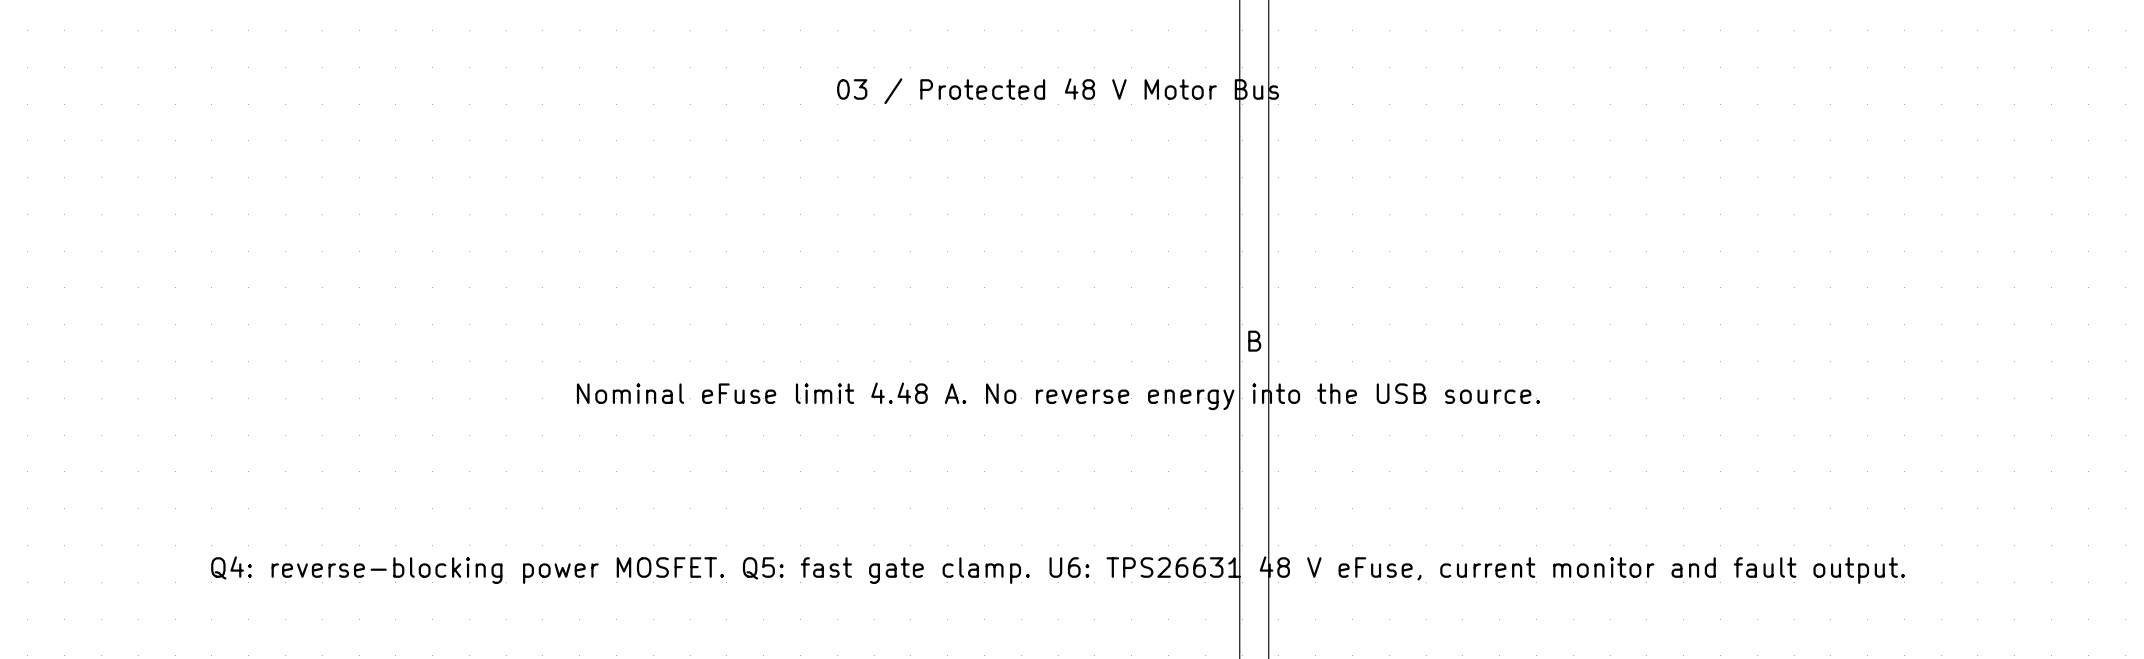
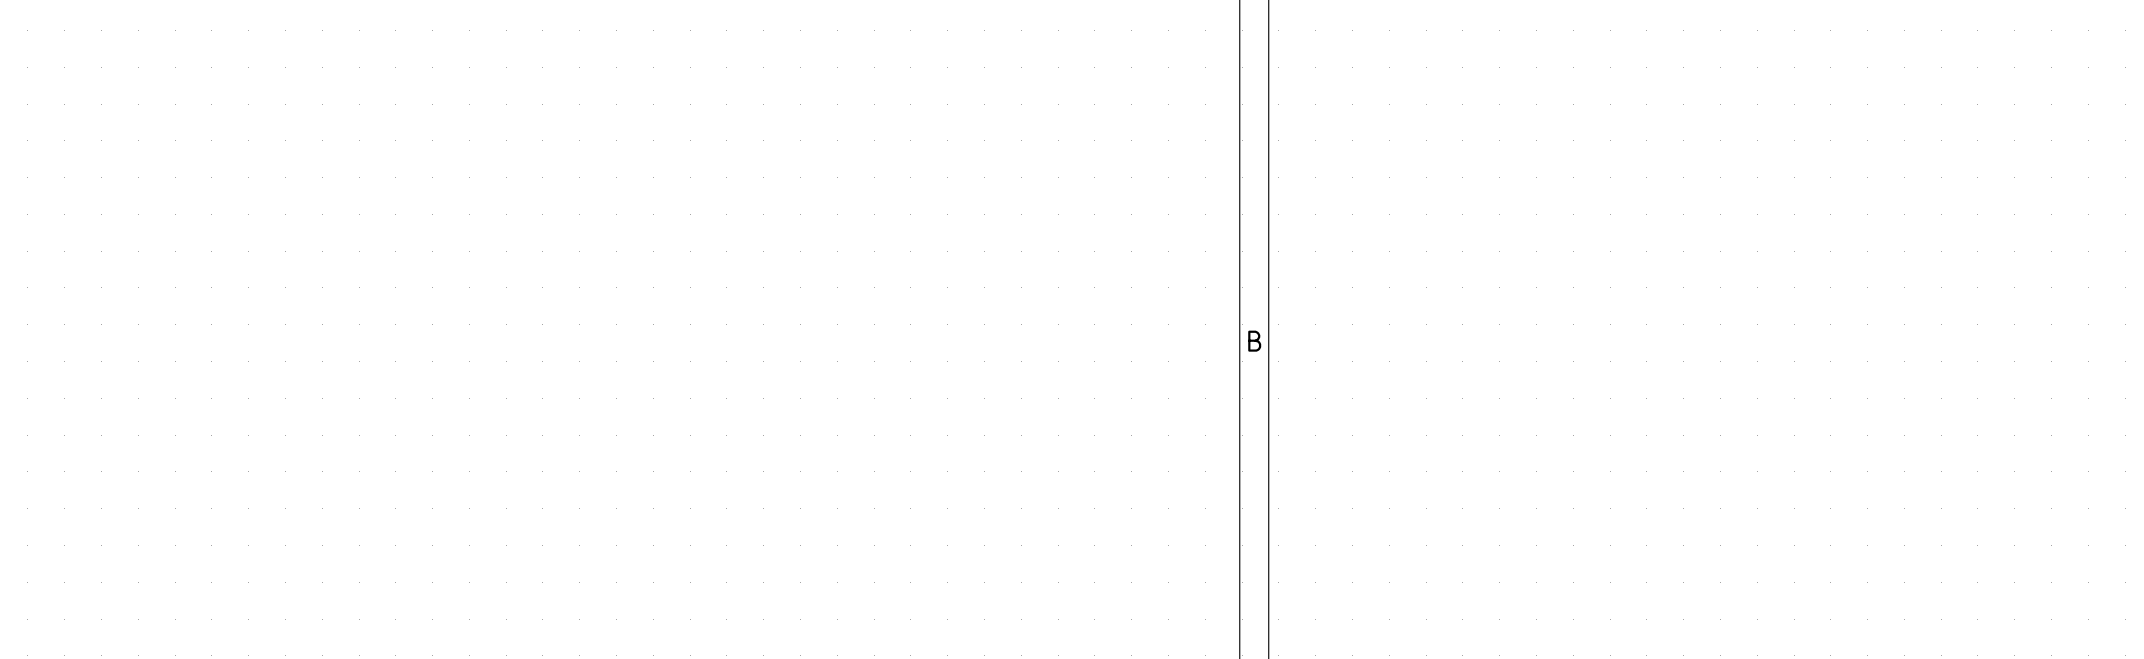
text: 03 / Protected 48 V Motor Bus (1058, 91) -> none
text: Nominal eFuse limit 4.48 A. No reverse energy into the USB source. (1058, 396) -> none
text: Q4: reverse-blocking power MOSFET. Q5: fast gate clamp. U6: TPS26631 48 V eFuse, current monitor and fault output. (1058, 570) -> none

